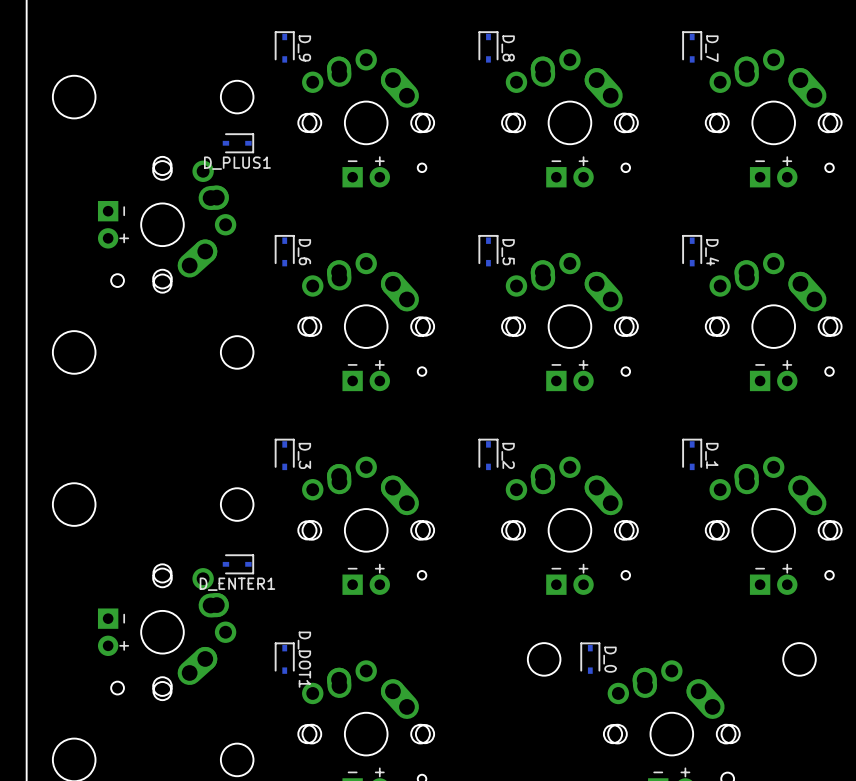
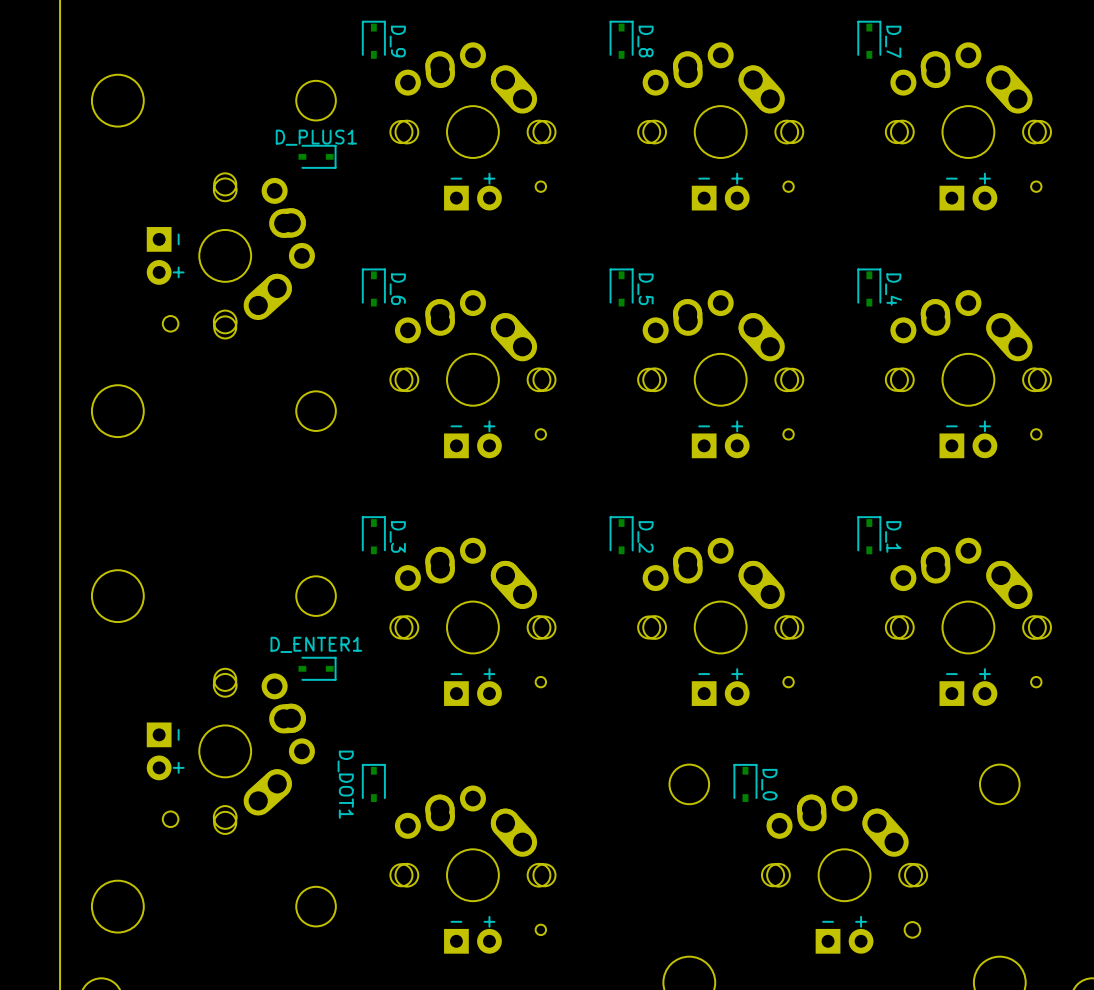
D_PLUS1 name position: D_PLUS1 (237, 163) -> D_PLUS1 (316, 137)
D_ENTER1 name position: D_ENTER1 (237, 584) -> D_ENTER1 (316, 644)
D_DOT1 name position: D_DOT1 (304, 659) -> D_DOT1 (345, 784)

